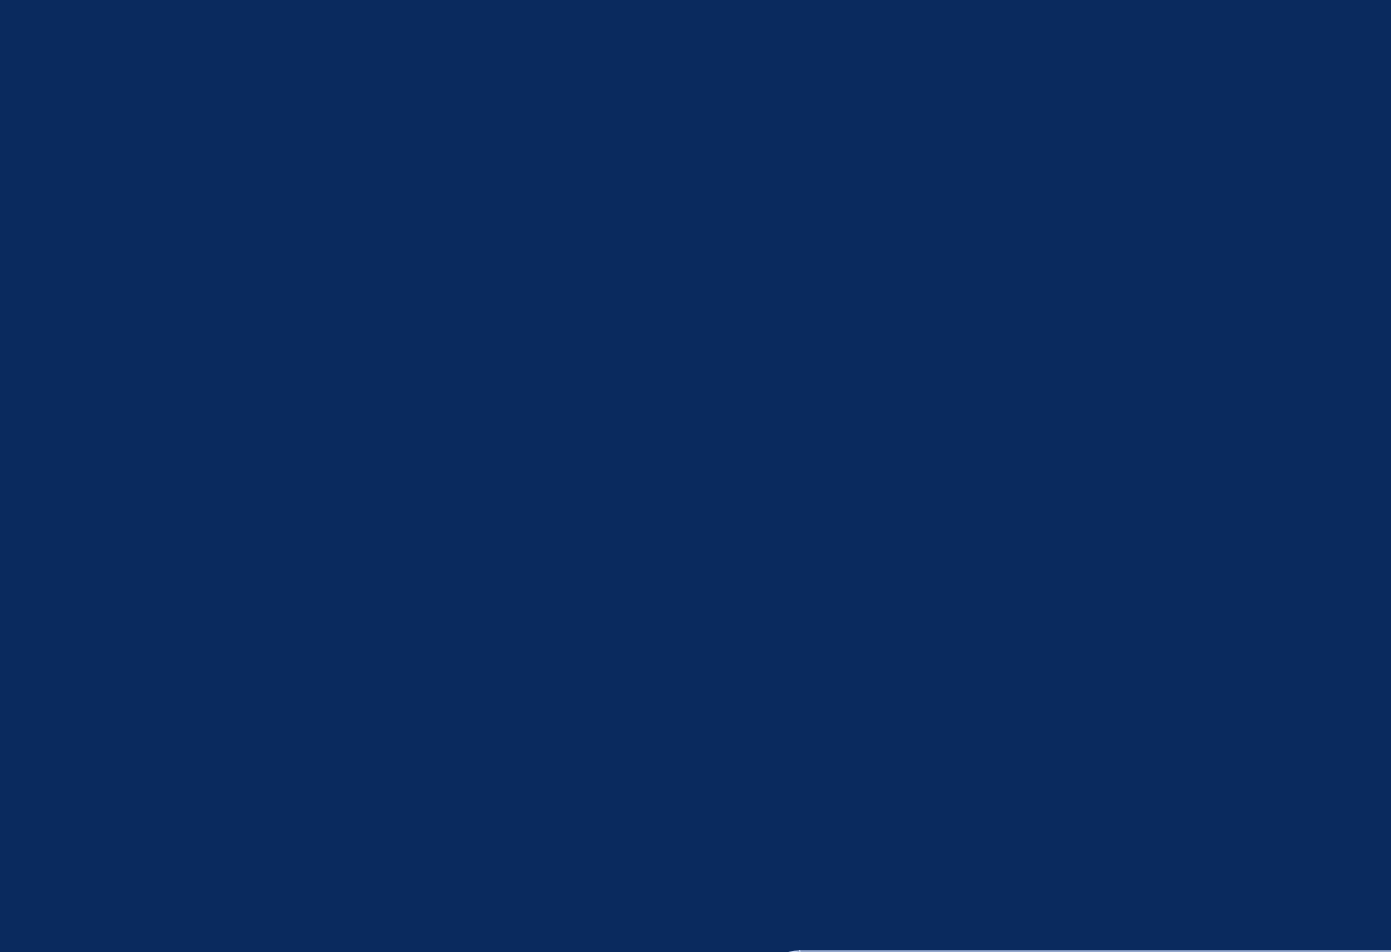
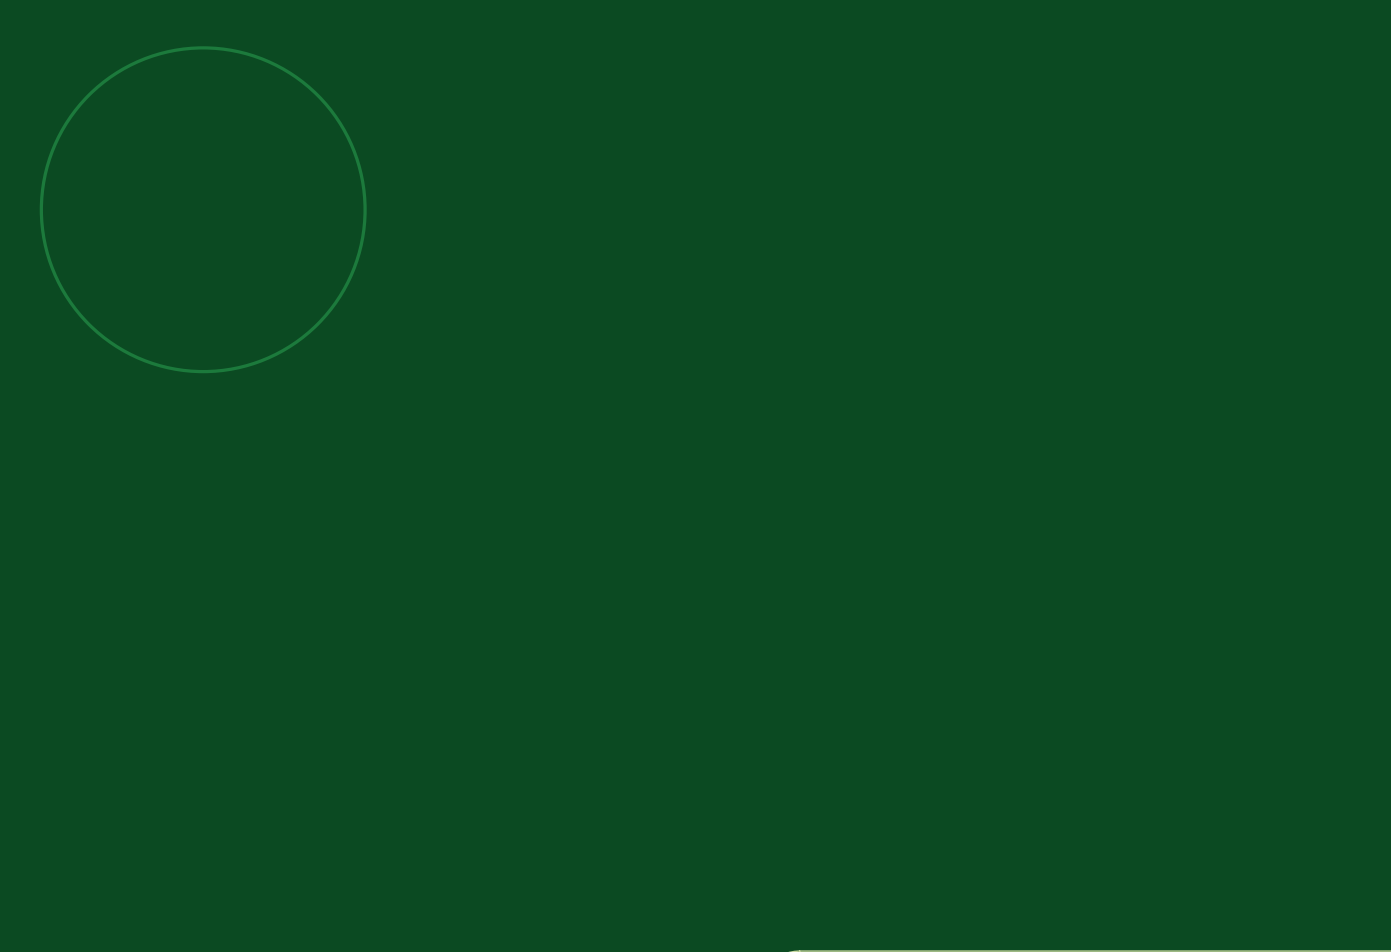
drawing: none -> [39, 46, 367, 374]

